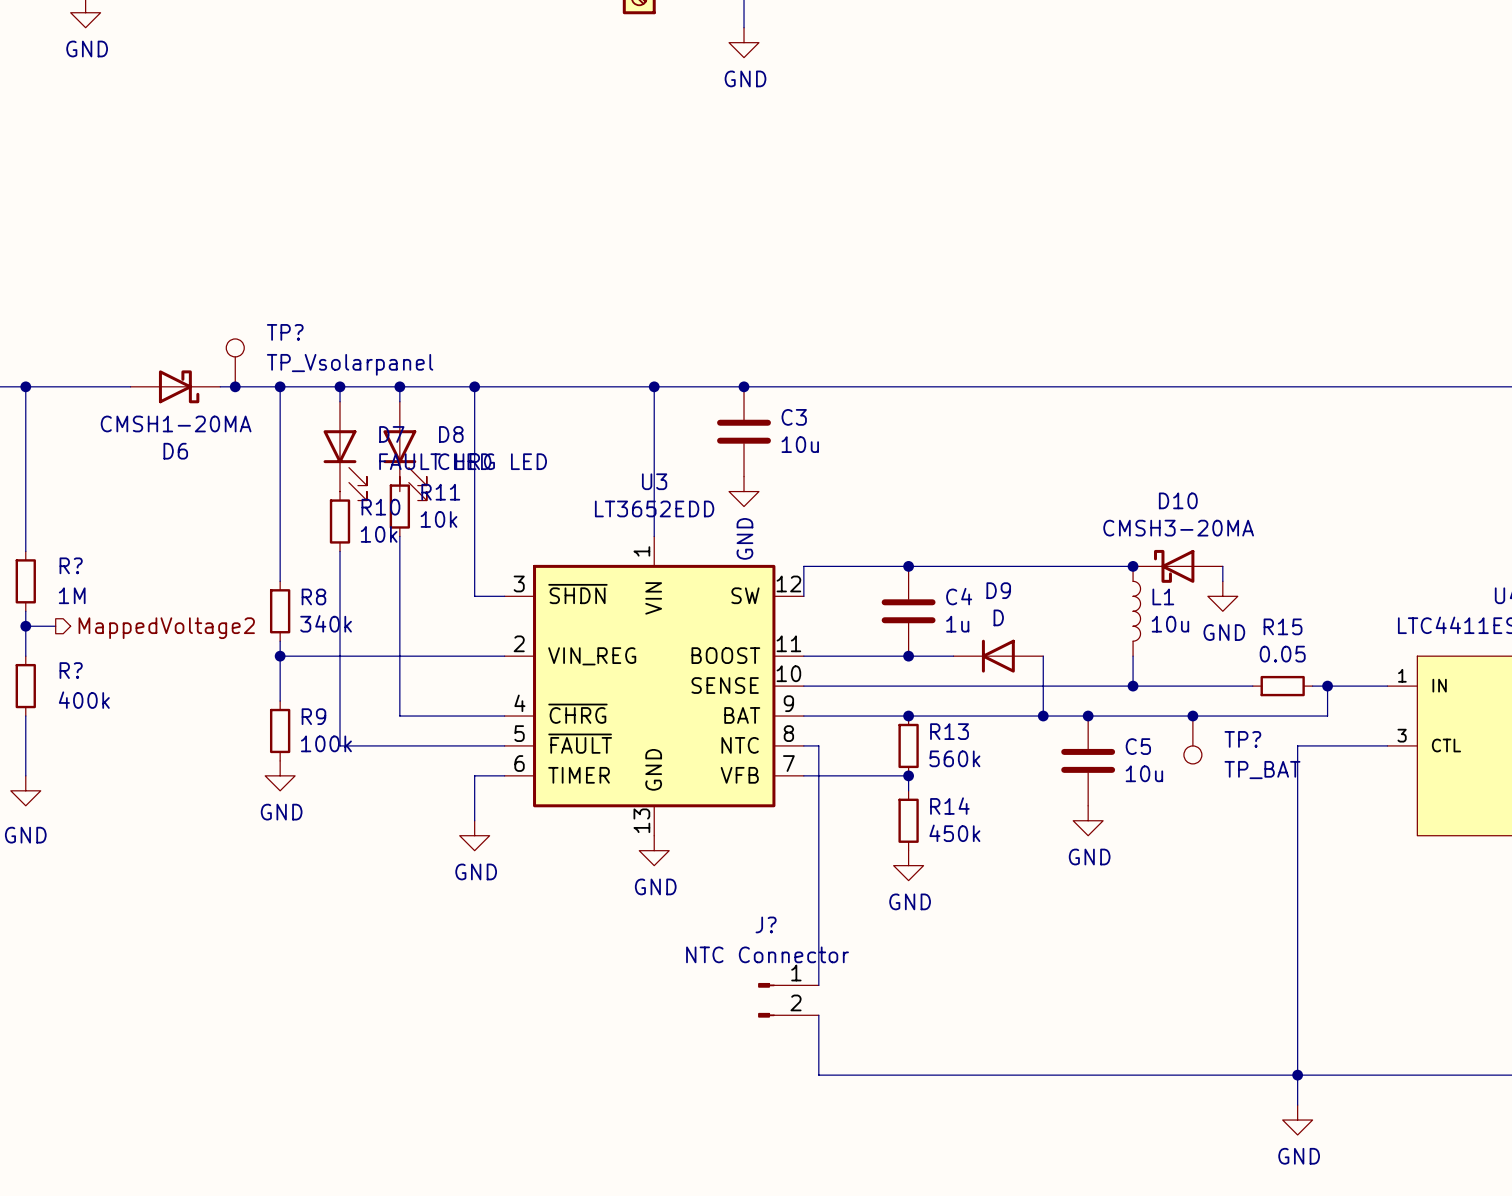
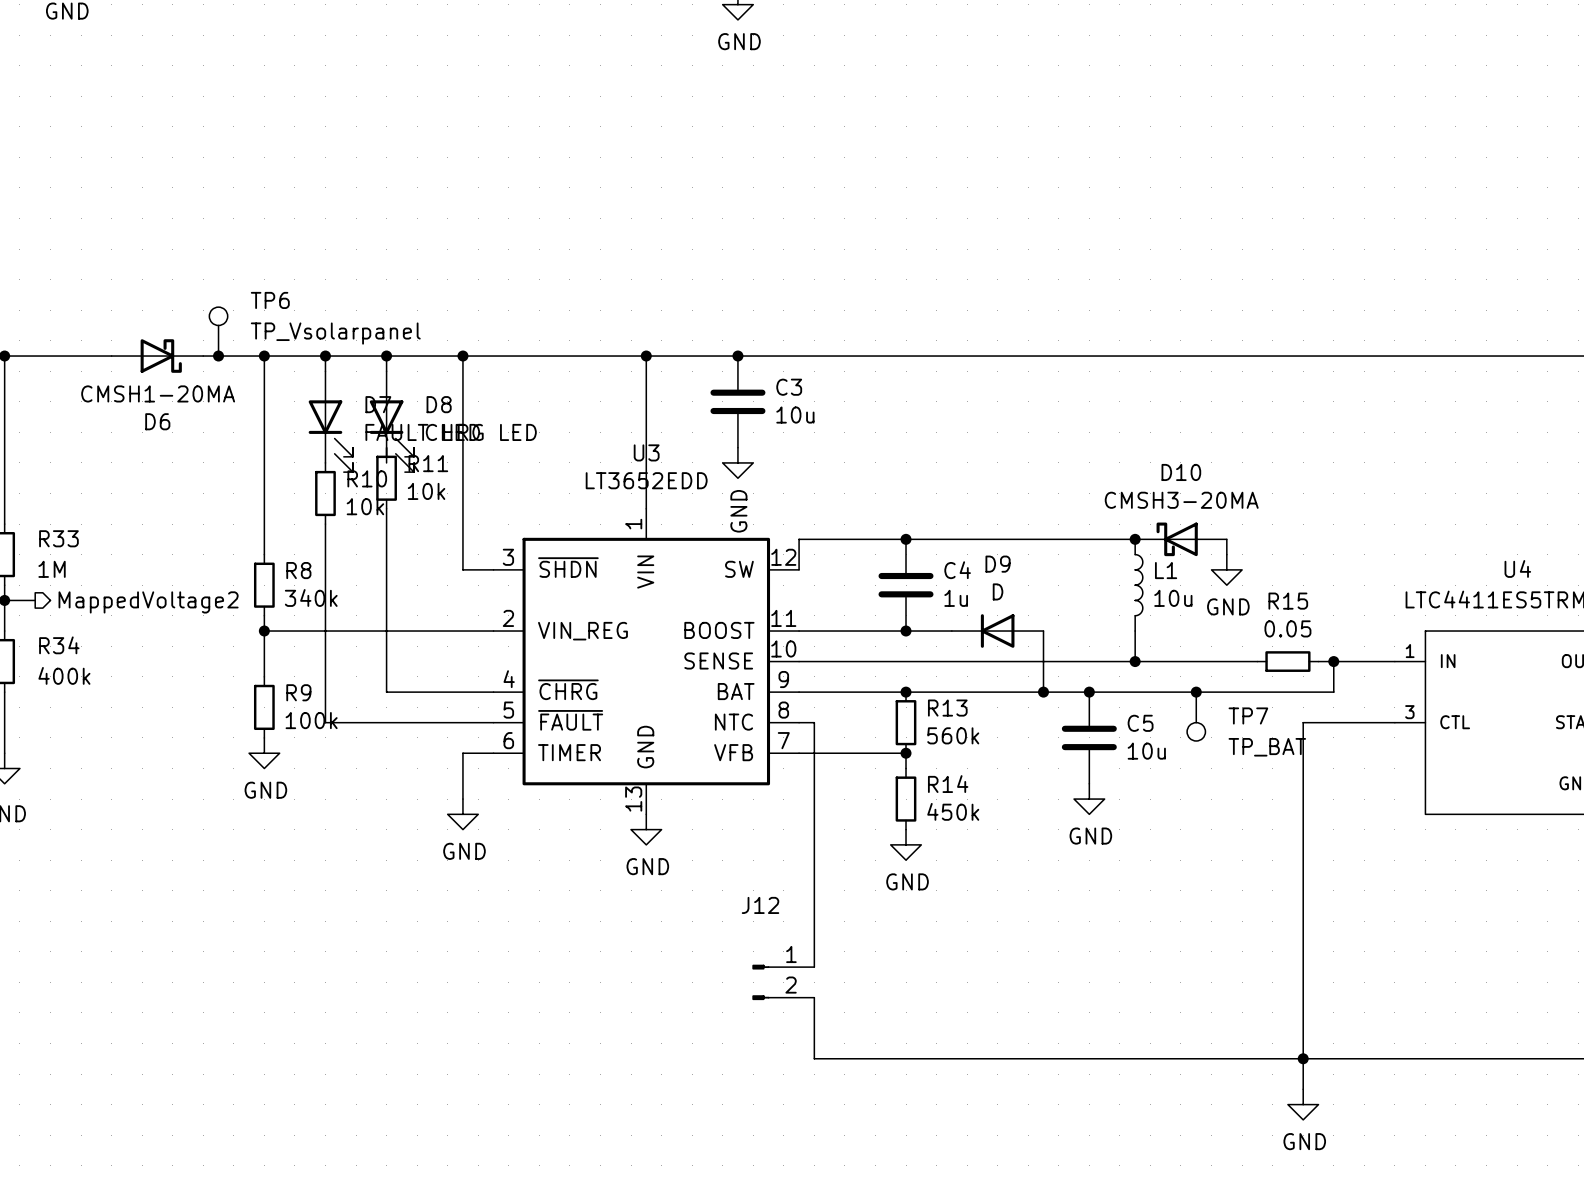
TP? name: TP? (285, 332) -> TP6 (270, 300)
R? name: R? (71, 565) -> R33 (58, 538)
R? name: R? (71, 670) -> R34 (59, 645)
TP? name: TP? (1242, 739) -> TP7 (1248, 715)
J? name: J? (766, 924) -> J12 (760, 905)
J? value: NTC Connector (767, 954) -> none

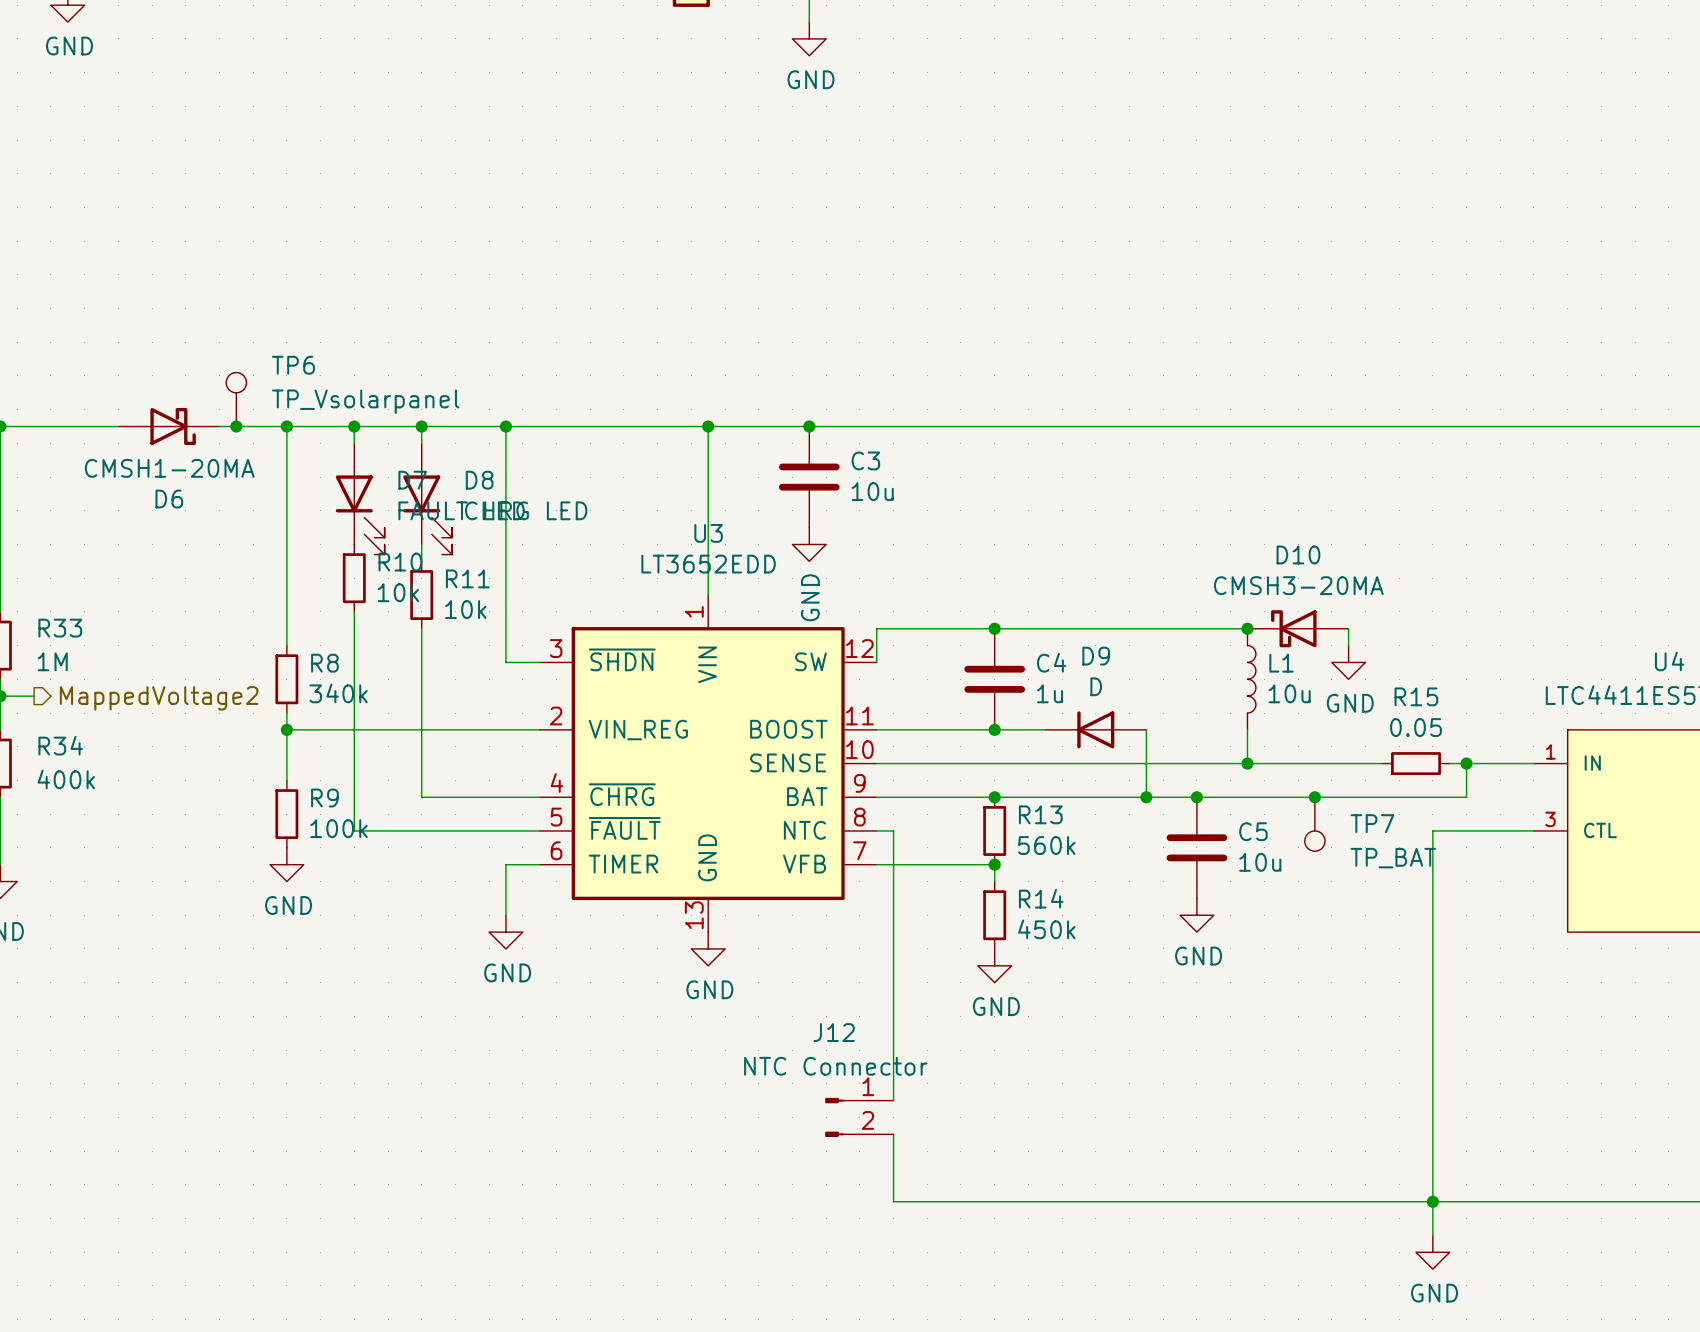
wire: none -> (421, 544) (421, 561)
R11 position: (386, 478) -> (421, 595)
wire: (386, 508) (386, 539) -> none
J12 value: none -> NTC Connector (835, 1066)

